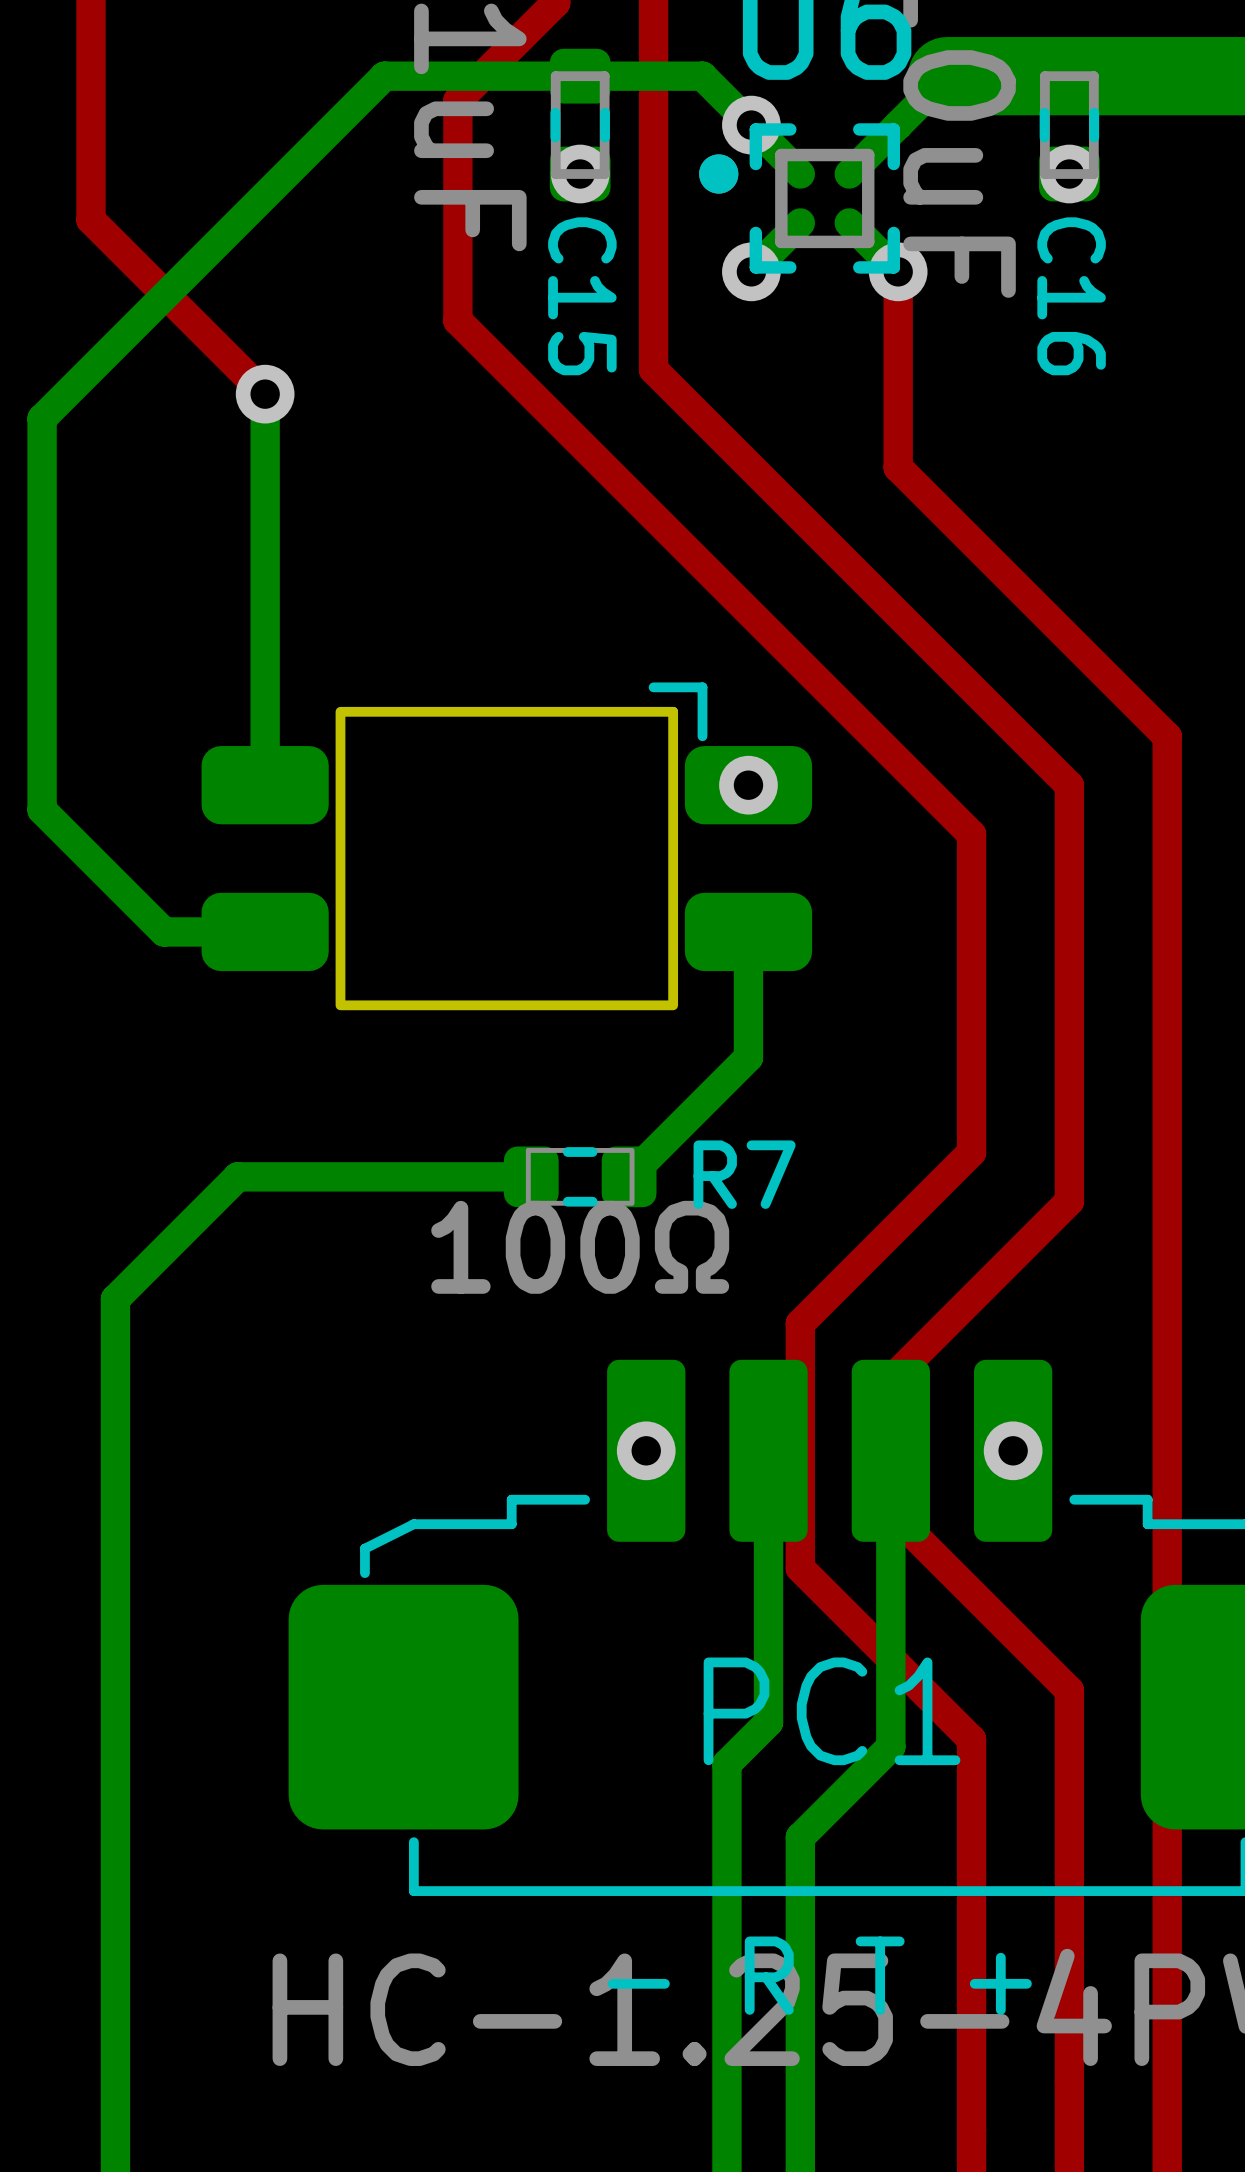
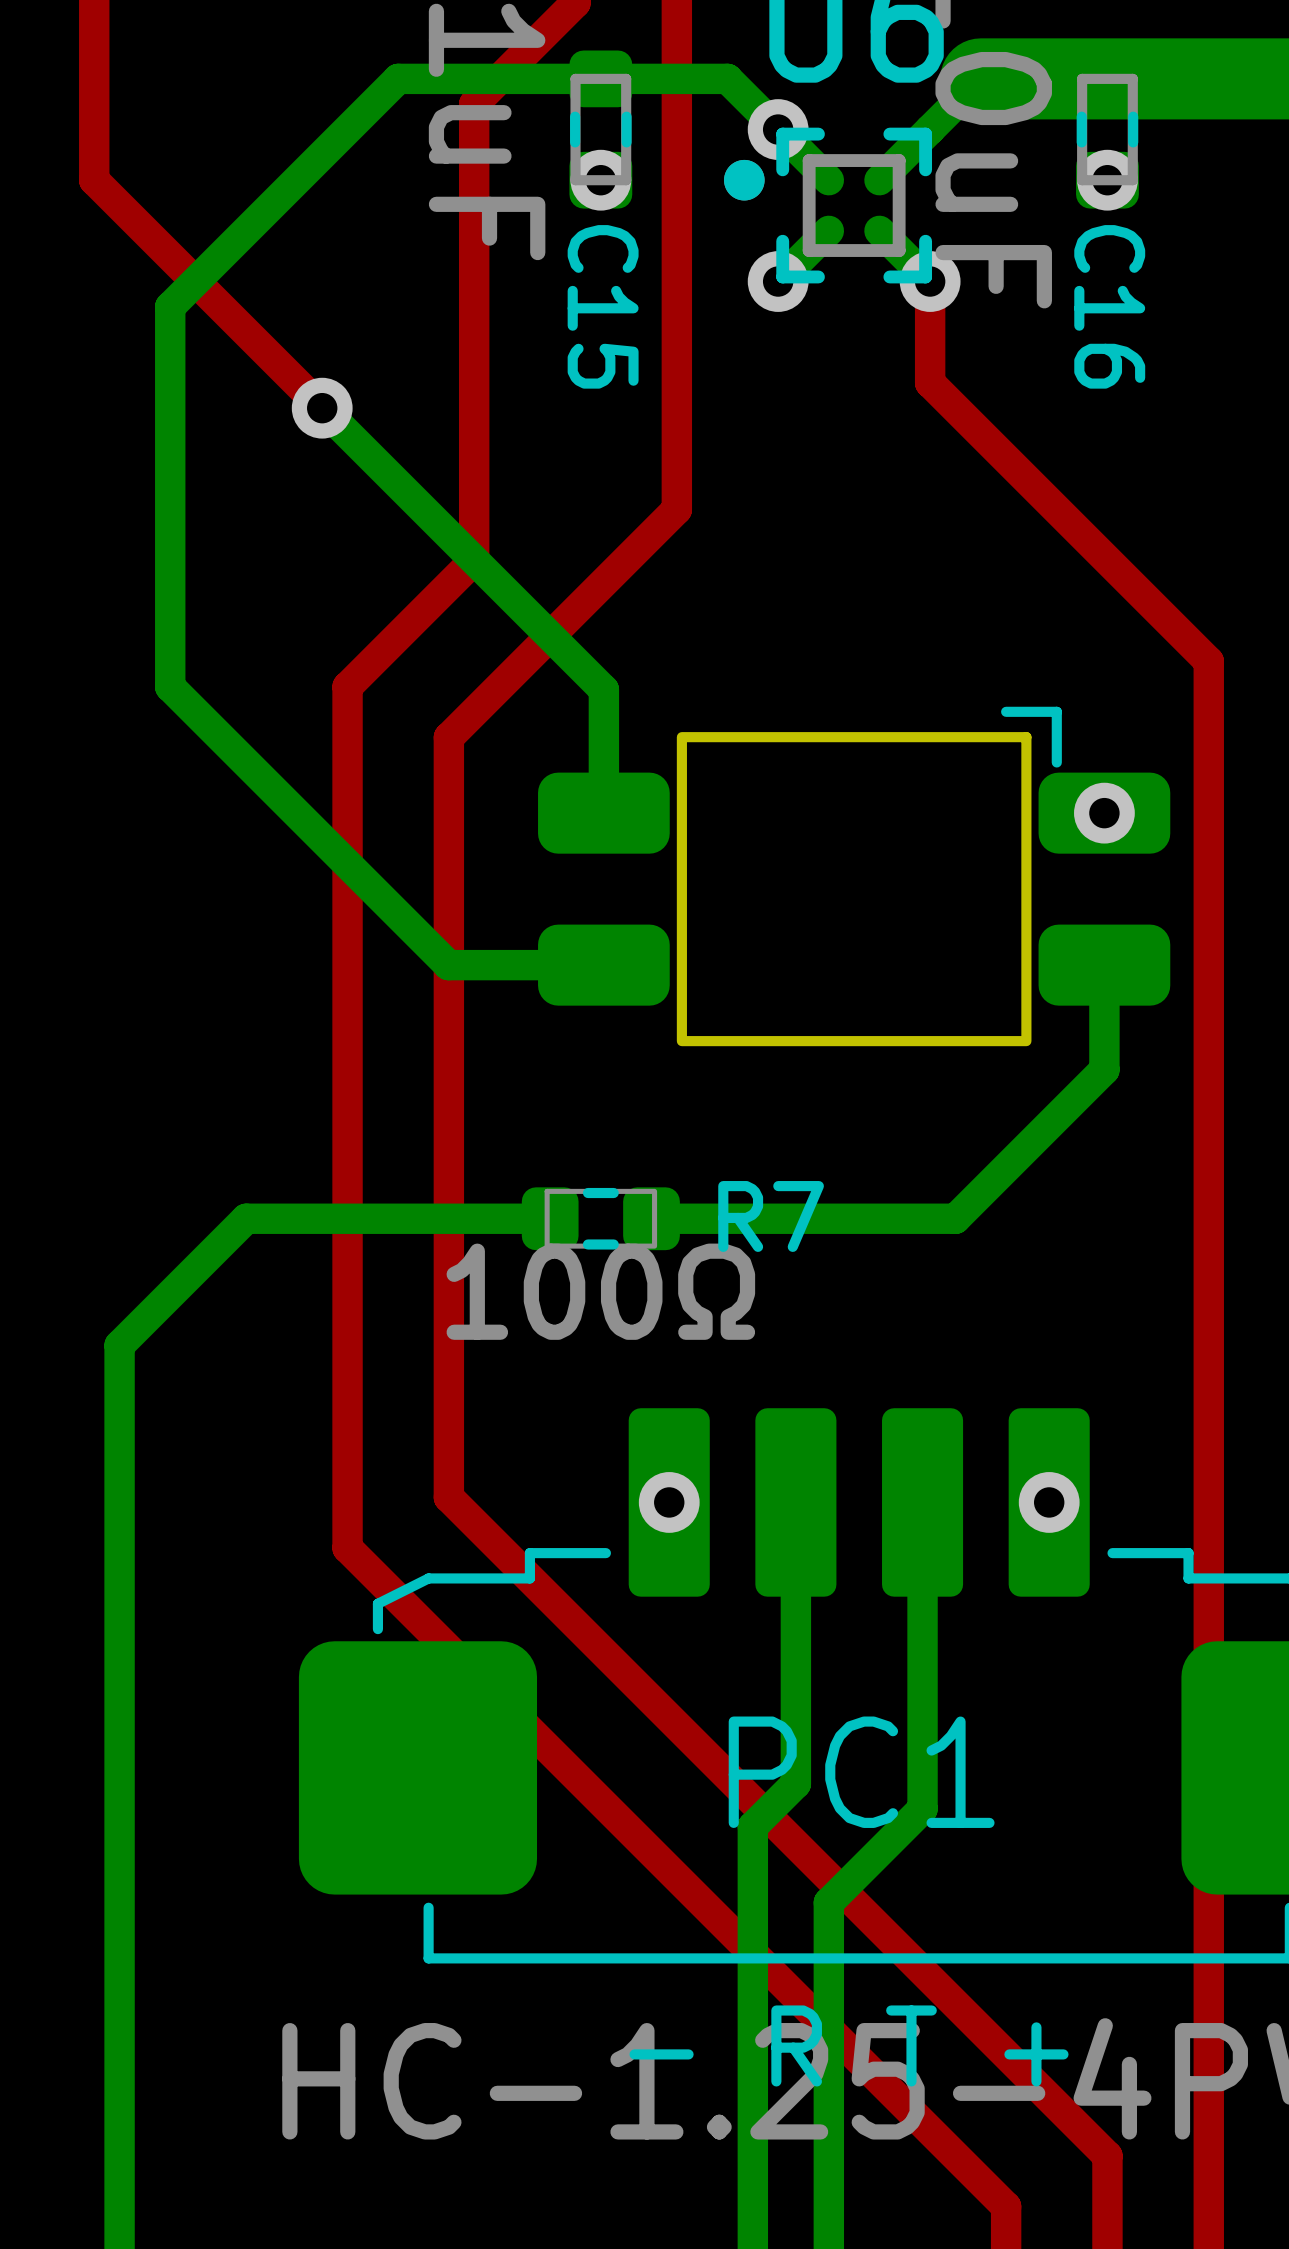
top track: (91, 174) (91, 219) (265, 394) -> (94, 180) (322, 408)
bottom track: (164, 296) (42, 418) (42, 809) (164, 931) (265, 931) -> (170, 306) (170, 686) (448, 965) (603, 965)
top track: (457, 320) (971, 834) (971, 1152) (800, 1323) (800, 1568) (971, 1739) (971, 2130) -> (474, 332) (474, 560) (347, 686) (347, 1548) (1006, 2206)
top track: (653, 369) (1069, 785) (1069, 1201) (898, 1372) (898, 1519) (1069, 1690) (1069, 2081) -> (676, 382) (676, 509) (448, 737) (448, 1497) (1107, 2155)
top track: (898, 369) (898, 467) (1167, 736) -> (930, 382) (1208, 661) (1208, 762)
bottom track: (265, 394) (265, 785) -> none
via position: (265, 394) -> (322, 408)
bottom track: none -> (322, 408) (603, 689) (603, 813)
via: (748, 785) -> none
via: none -> (1104, 813)
part position: (506, 846) -> (854, 876)
bottom track: (748, 931) (748, 1057) (629, 1176) -> (1104, 965) (1104, 1069) (955, 1218) (651, 1218)

